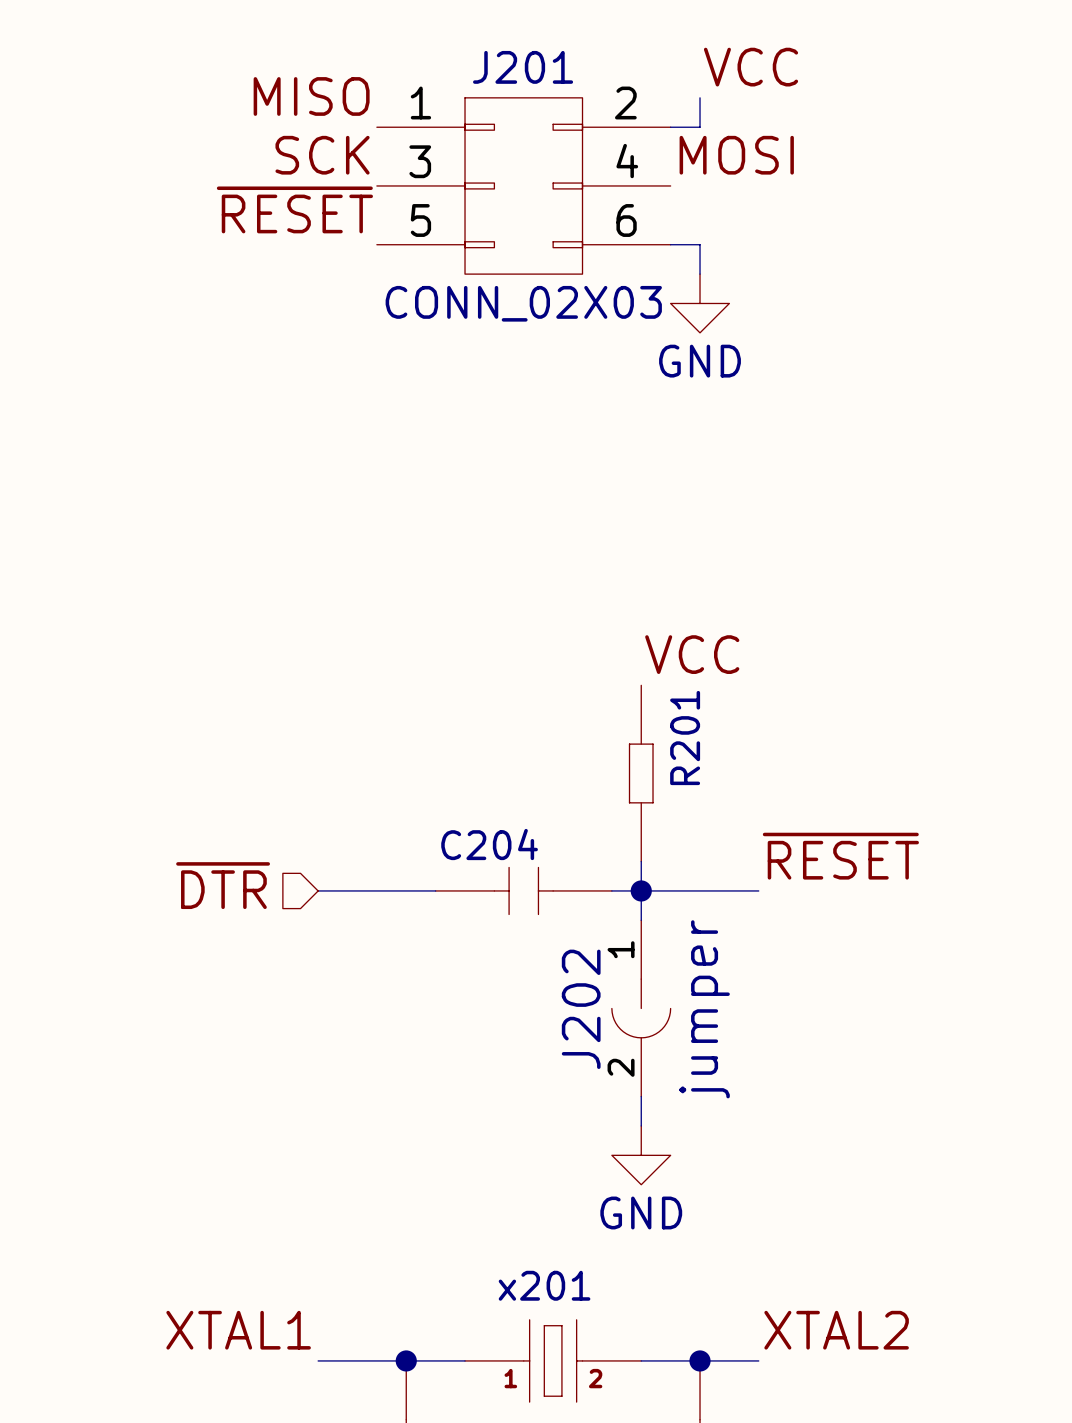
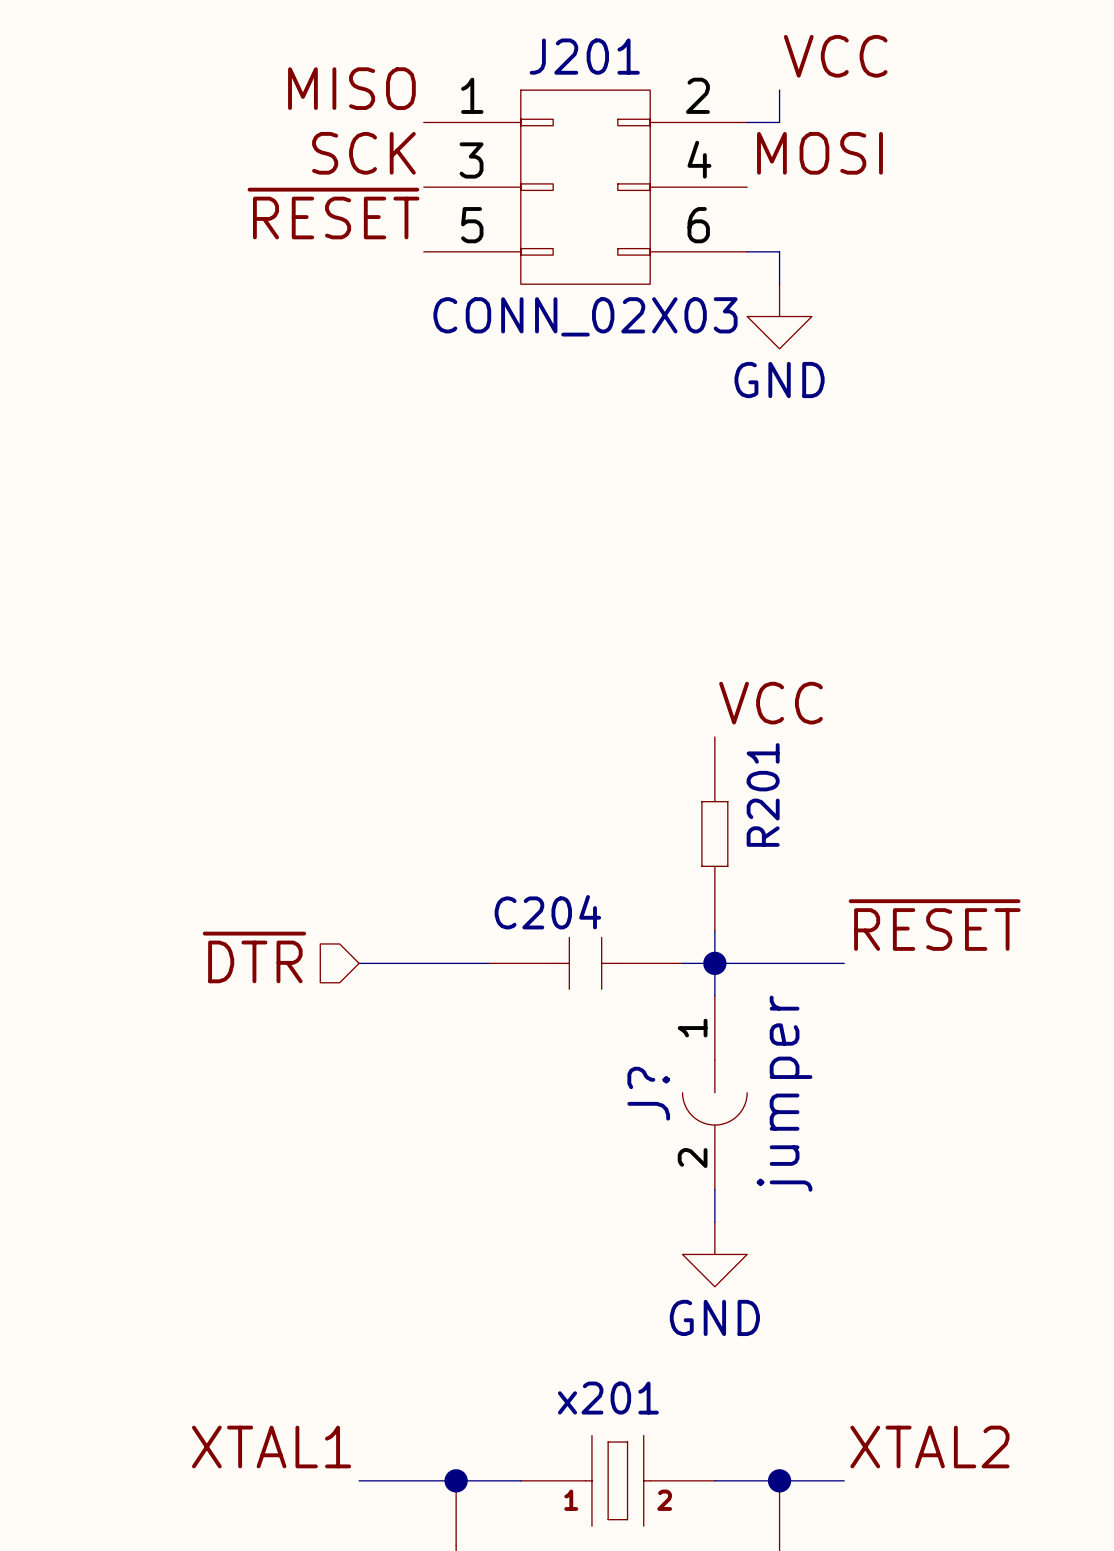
J202 name: J202 (581, 1009) -> J? (648, 1093)

